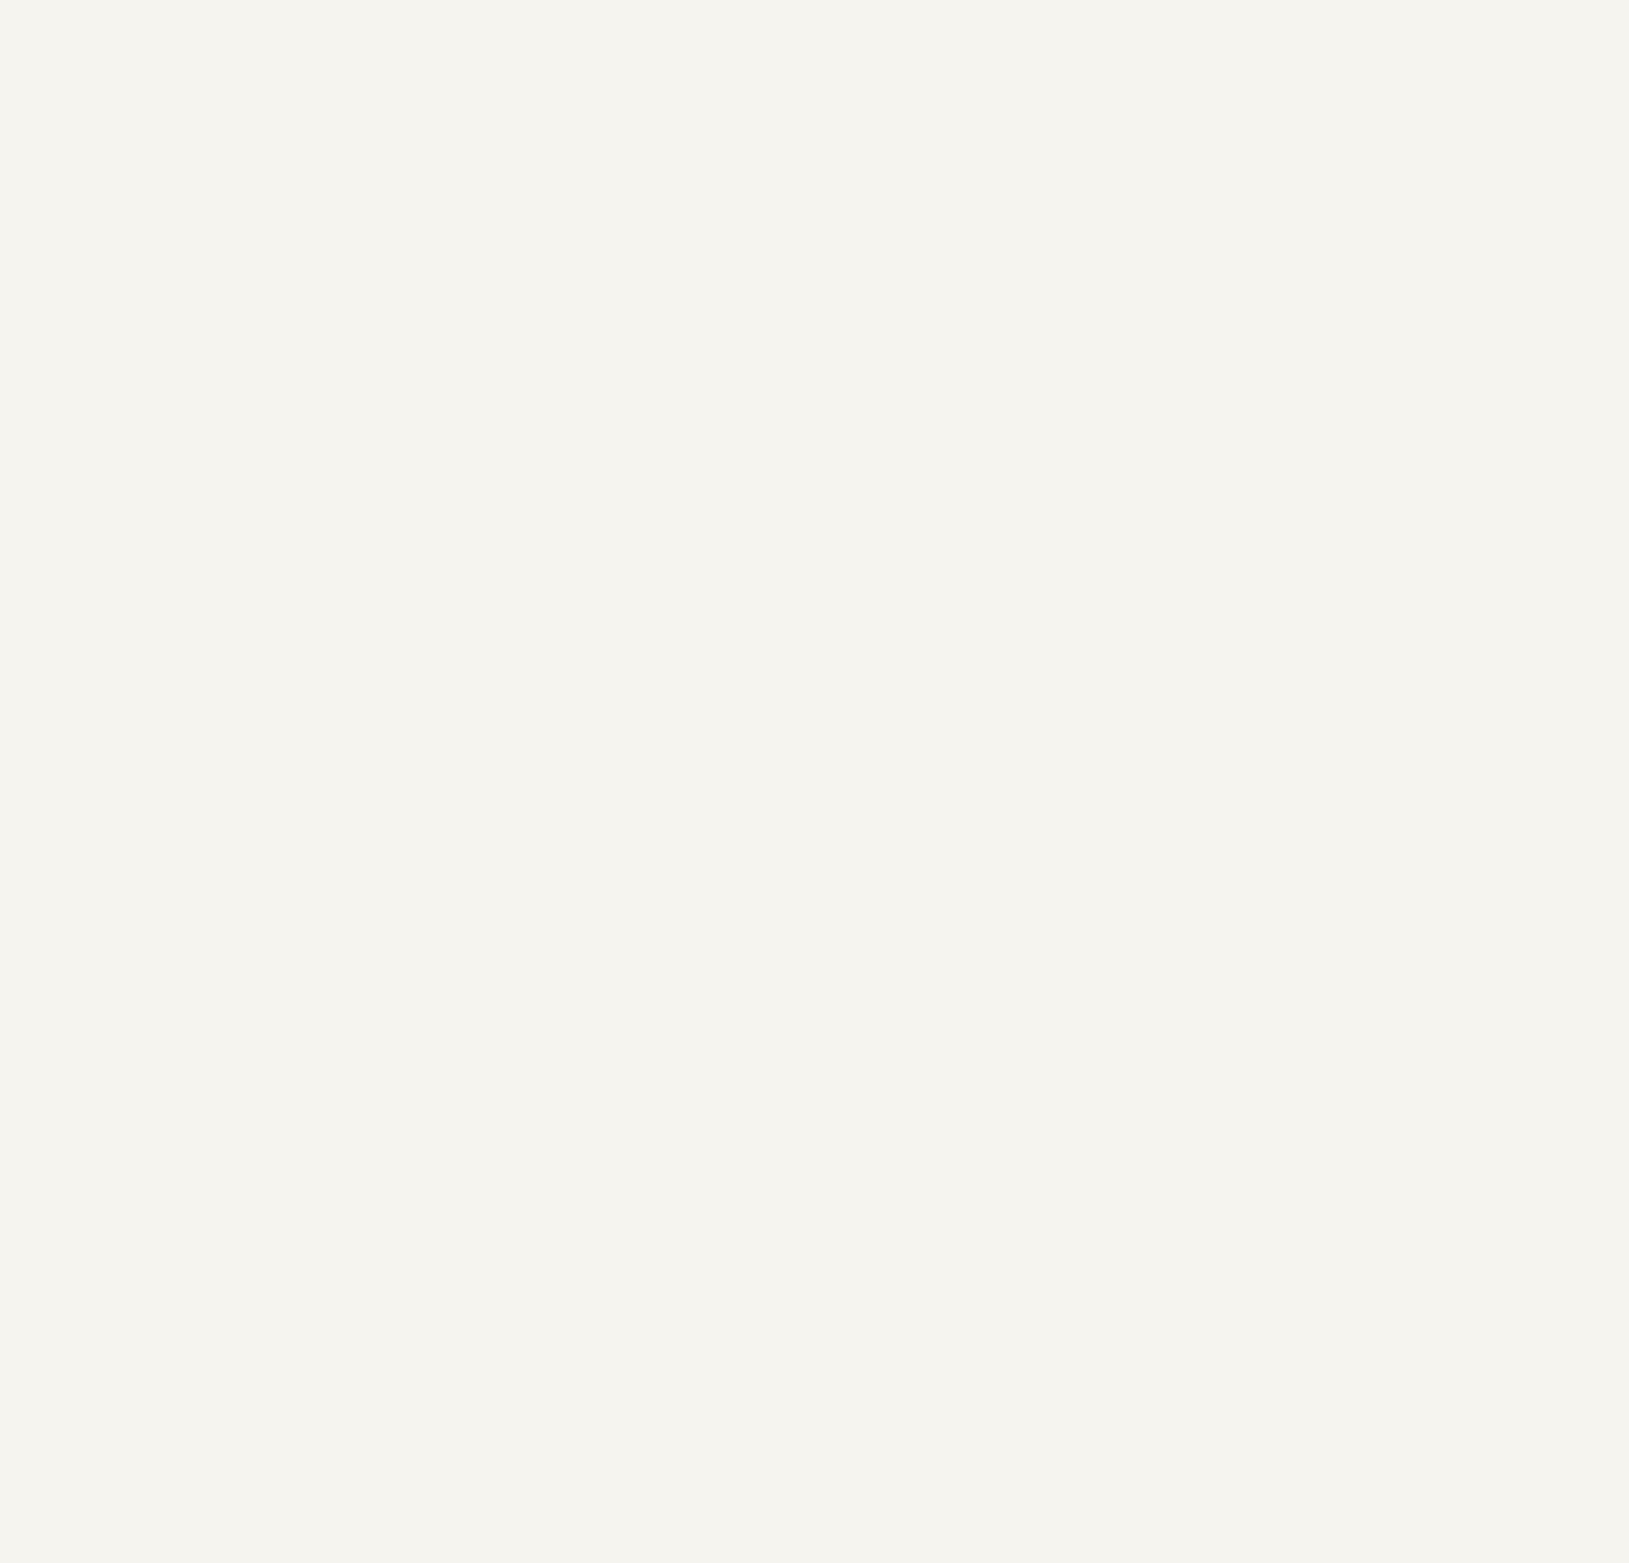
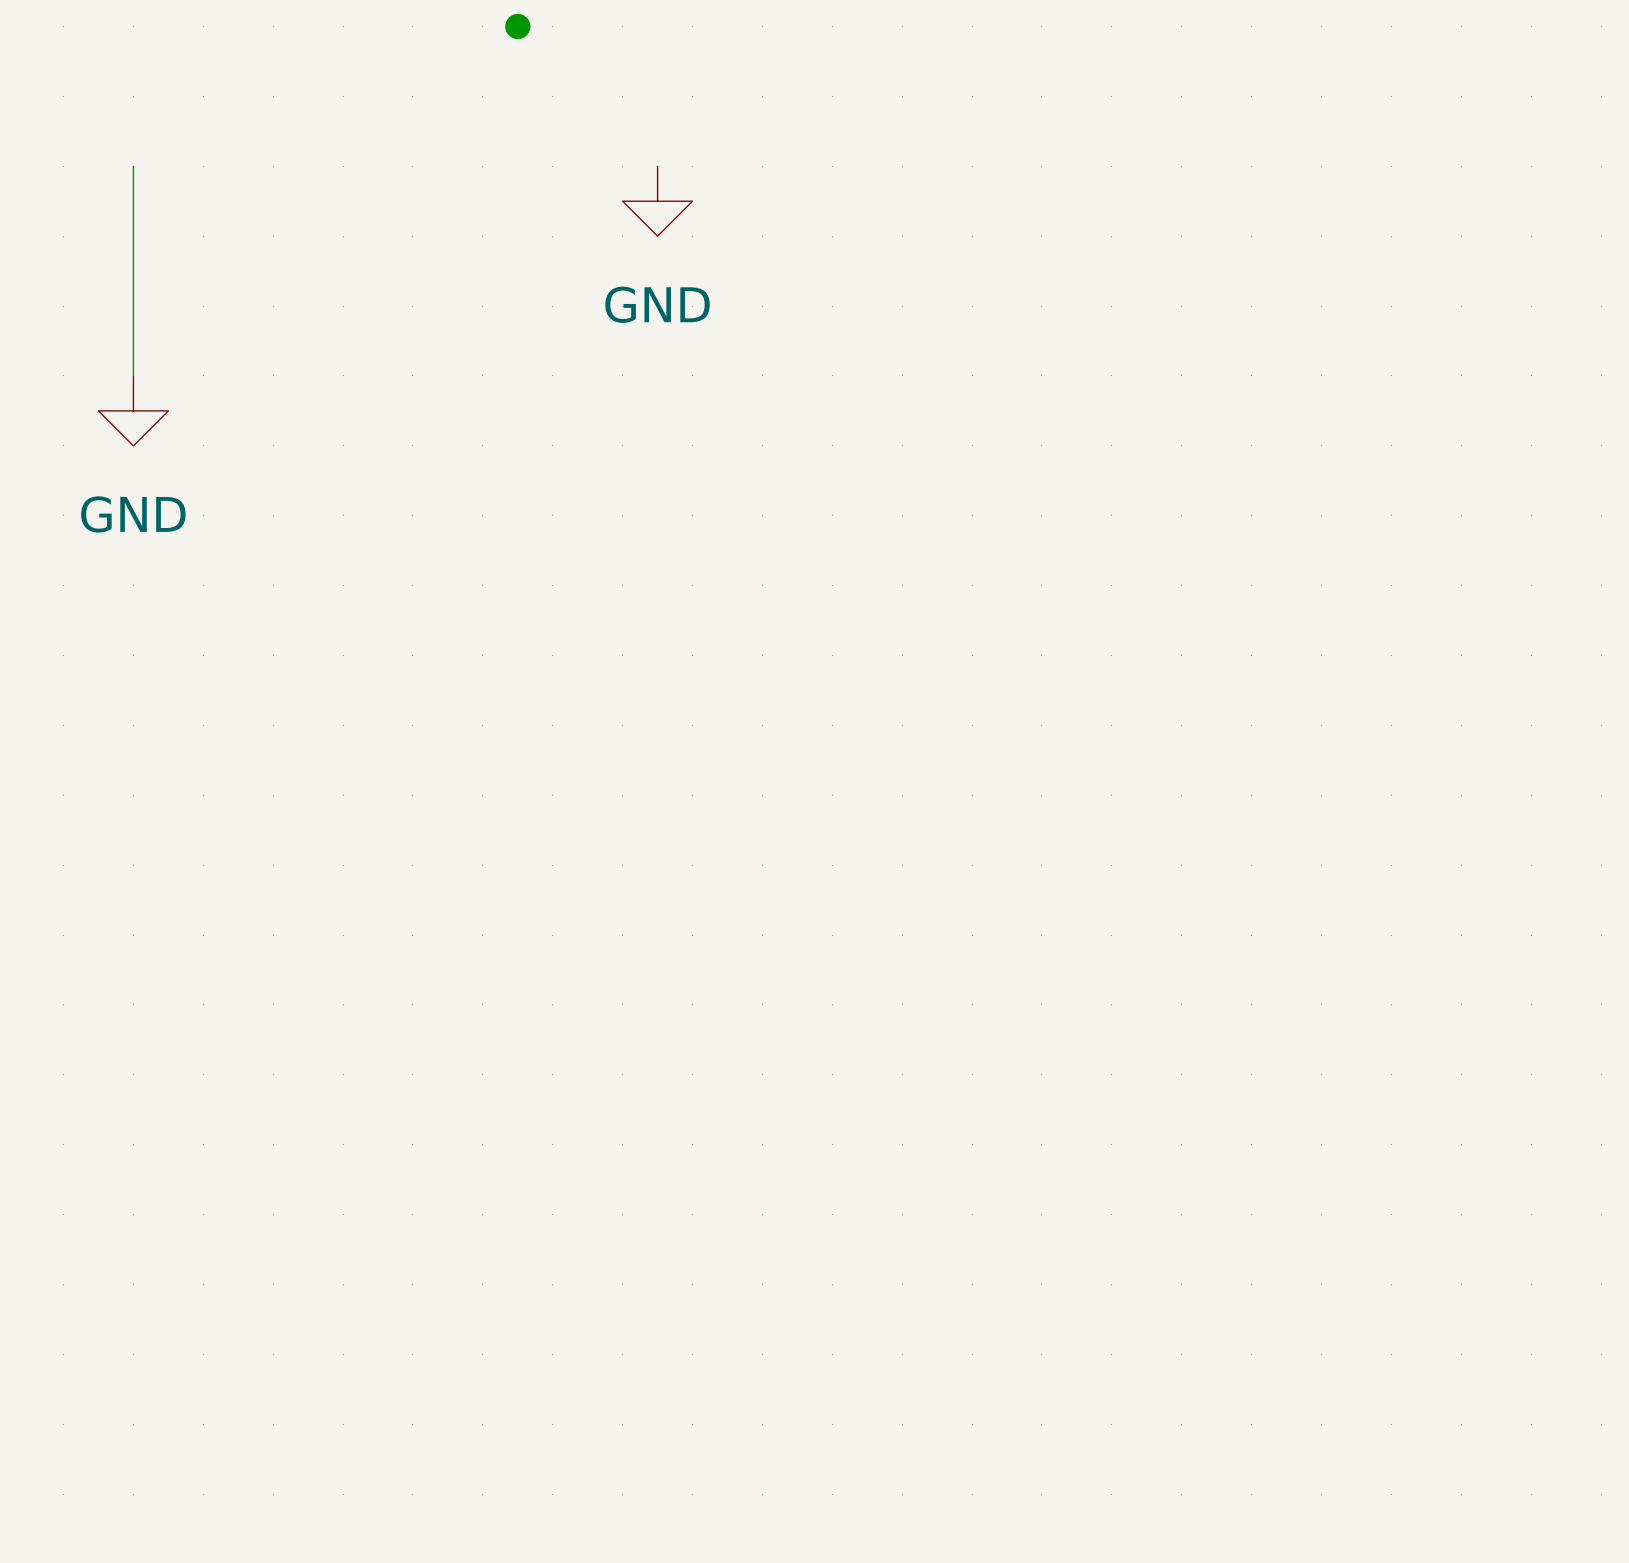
junction: none -> (517, 26)
wire: none -> (133, 166) (133, 375)
power symbol: none -> GND (657, 201)
power symbol: none -> GND (133, 410)

